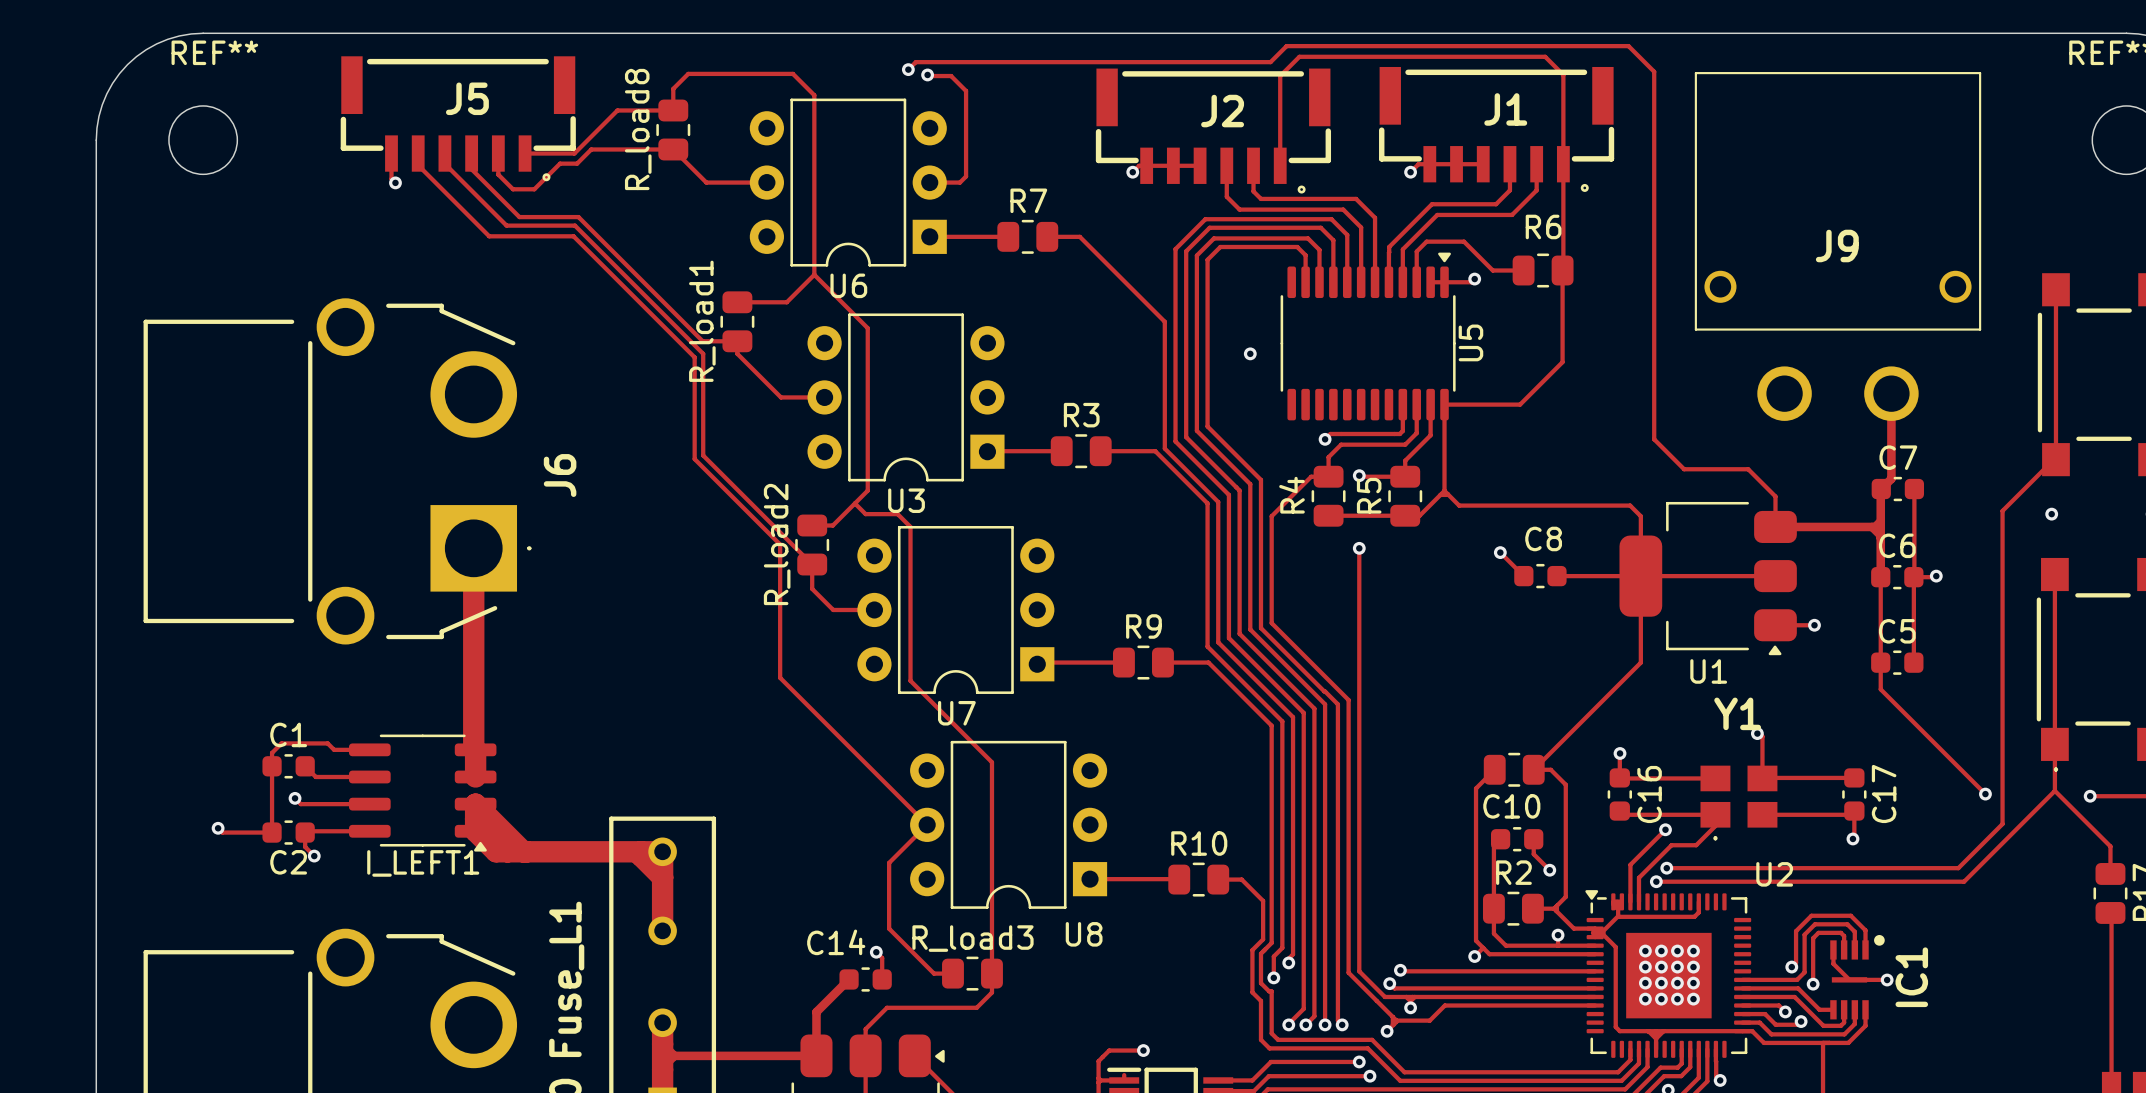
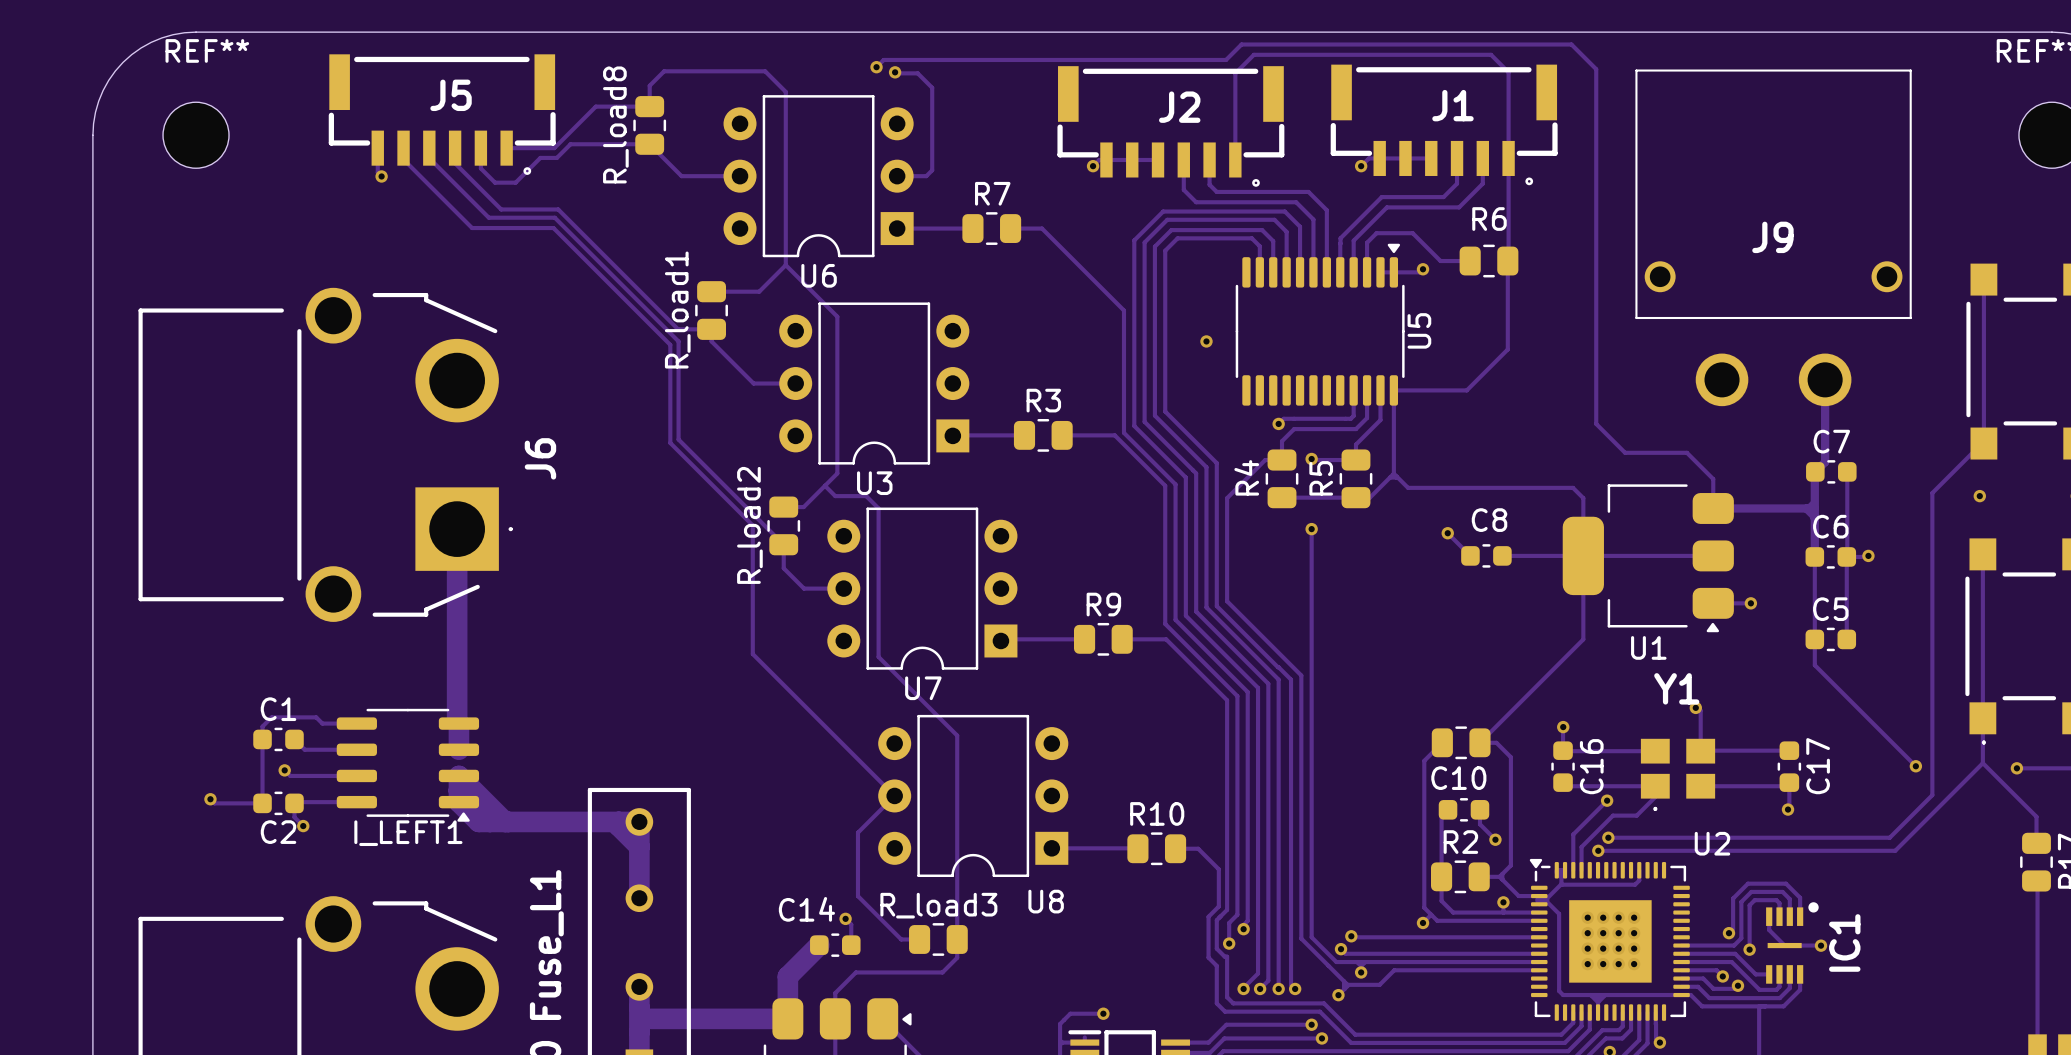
track width: thin (849, 979) (816, 1012) (816, 1055) (674, 1055) -> thick (819, 945) (787, 976) (787, 1018) (650, 1018)

